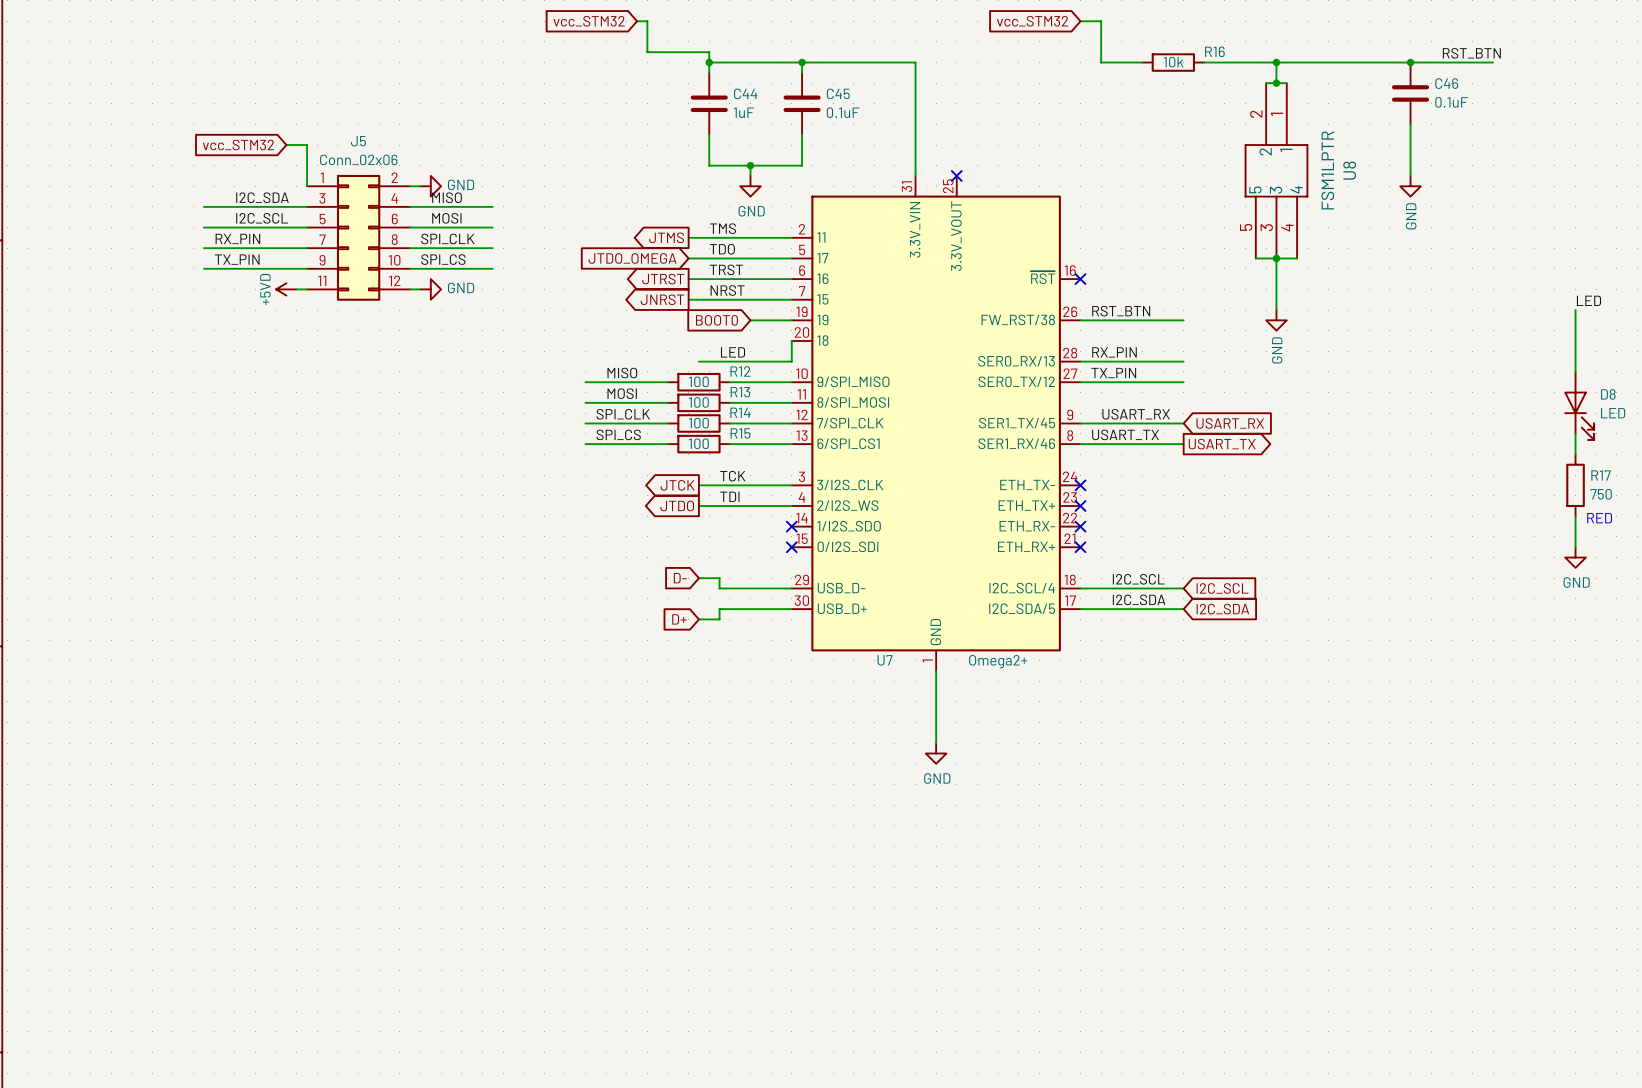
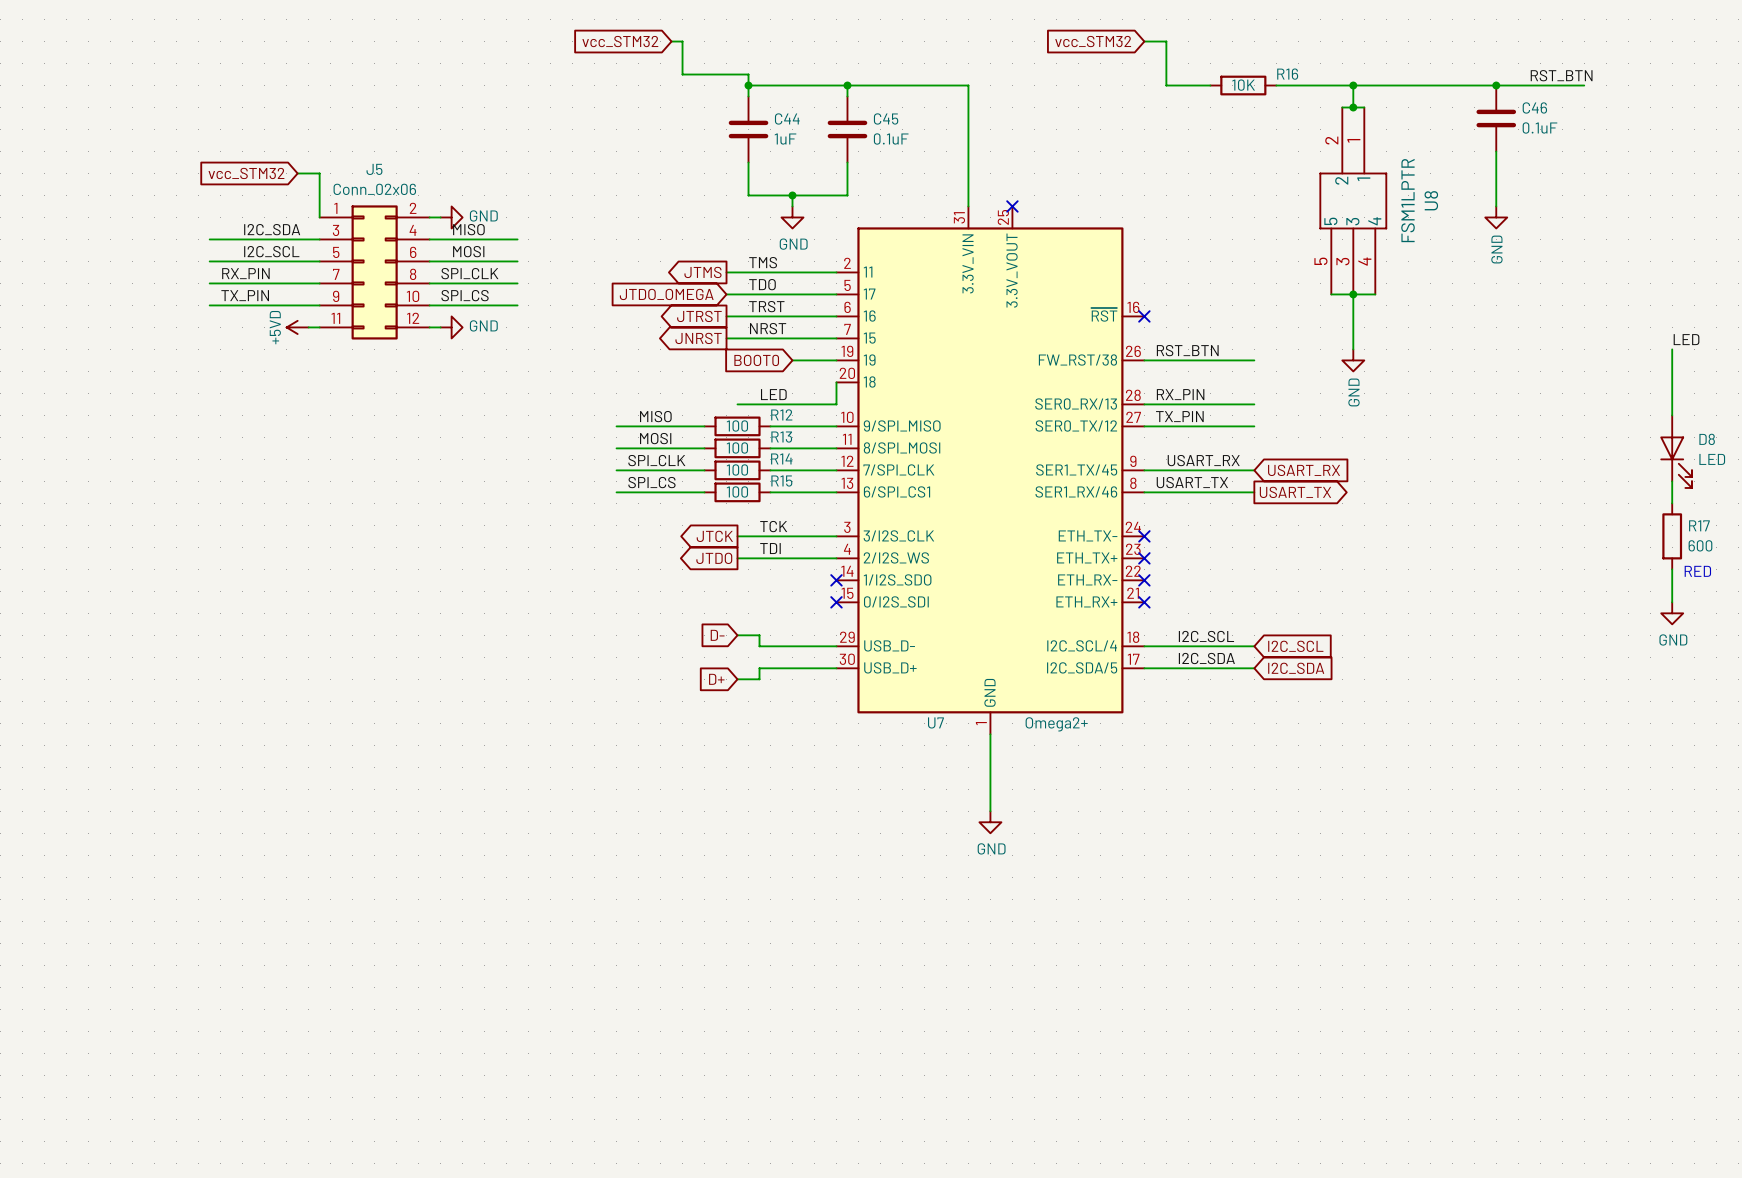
R16 value: 10k (1173, 62) -> 10K (1243, 85)
R17 value: 750 (1601, 494) -> 600 (1700, 545)

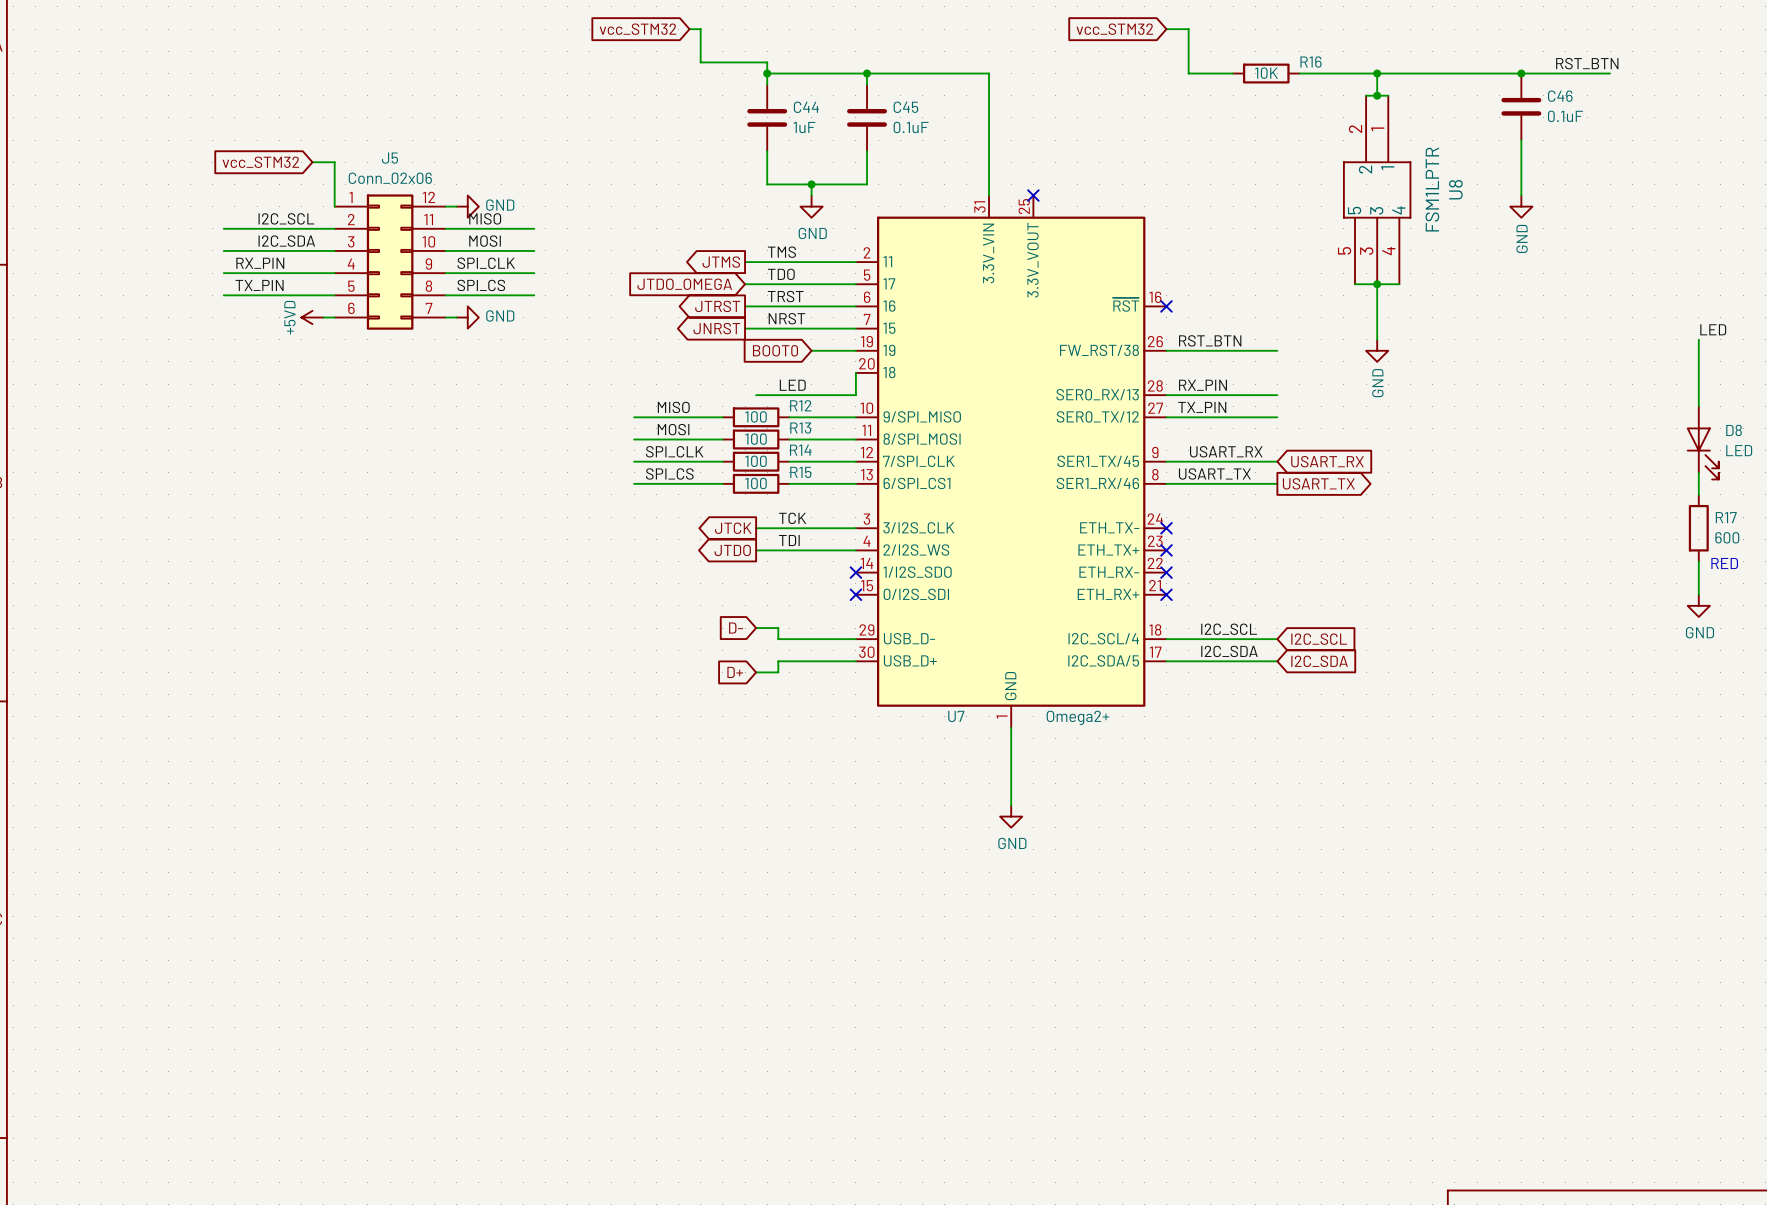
J5 symbol: [319, 205, 430, 340] -> [334, 194, 446, 330]
label: I2C_SDA (272, 229) -> I2C_SCL (286, 218)
label: I2C_SCL (271, 251) -> I2C_SDA (286, 241)

